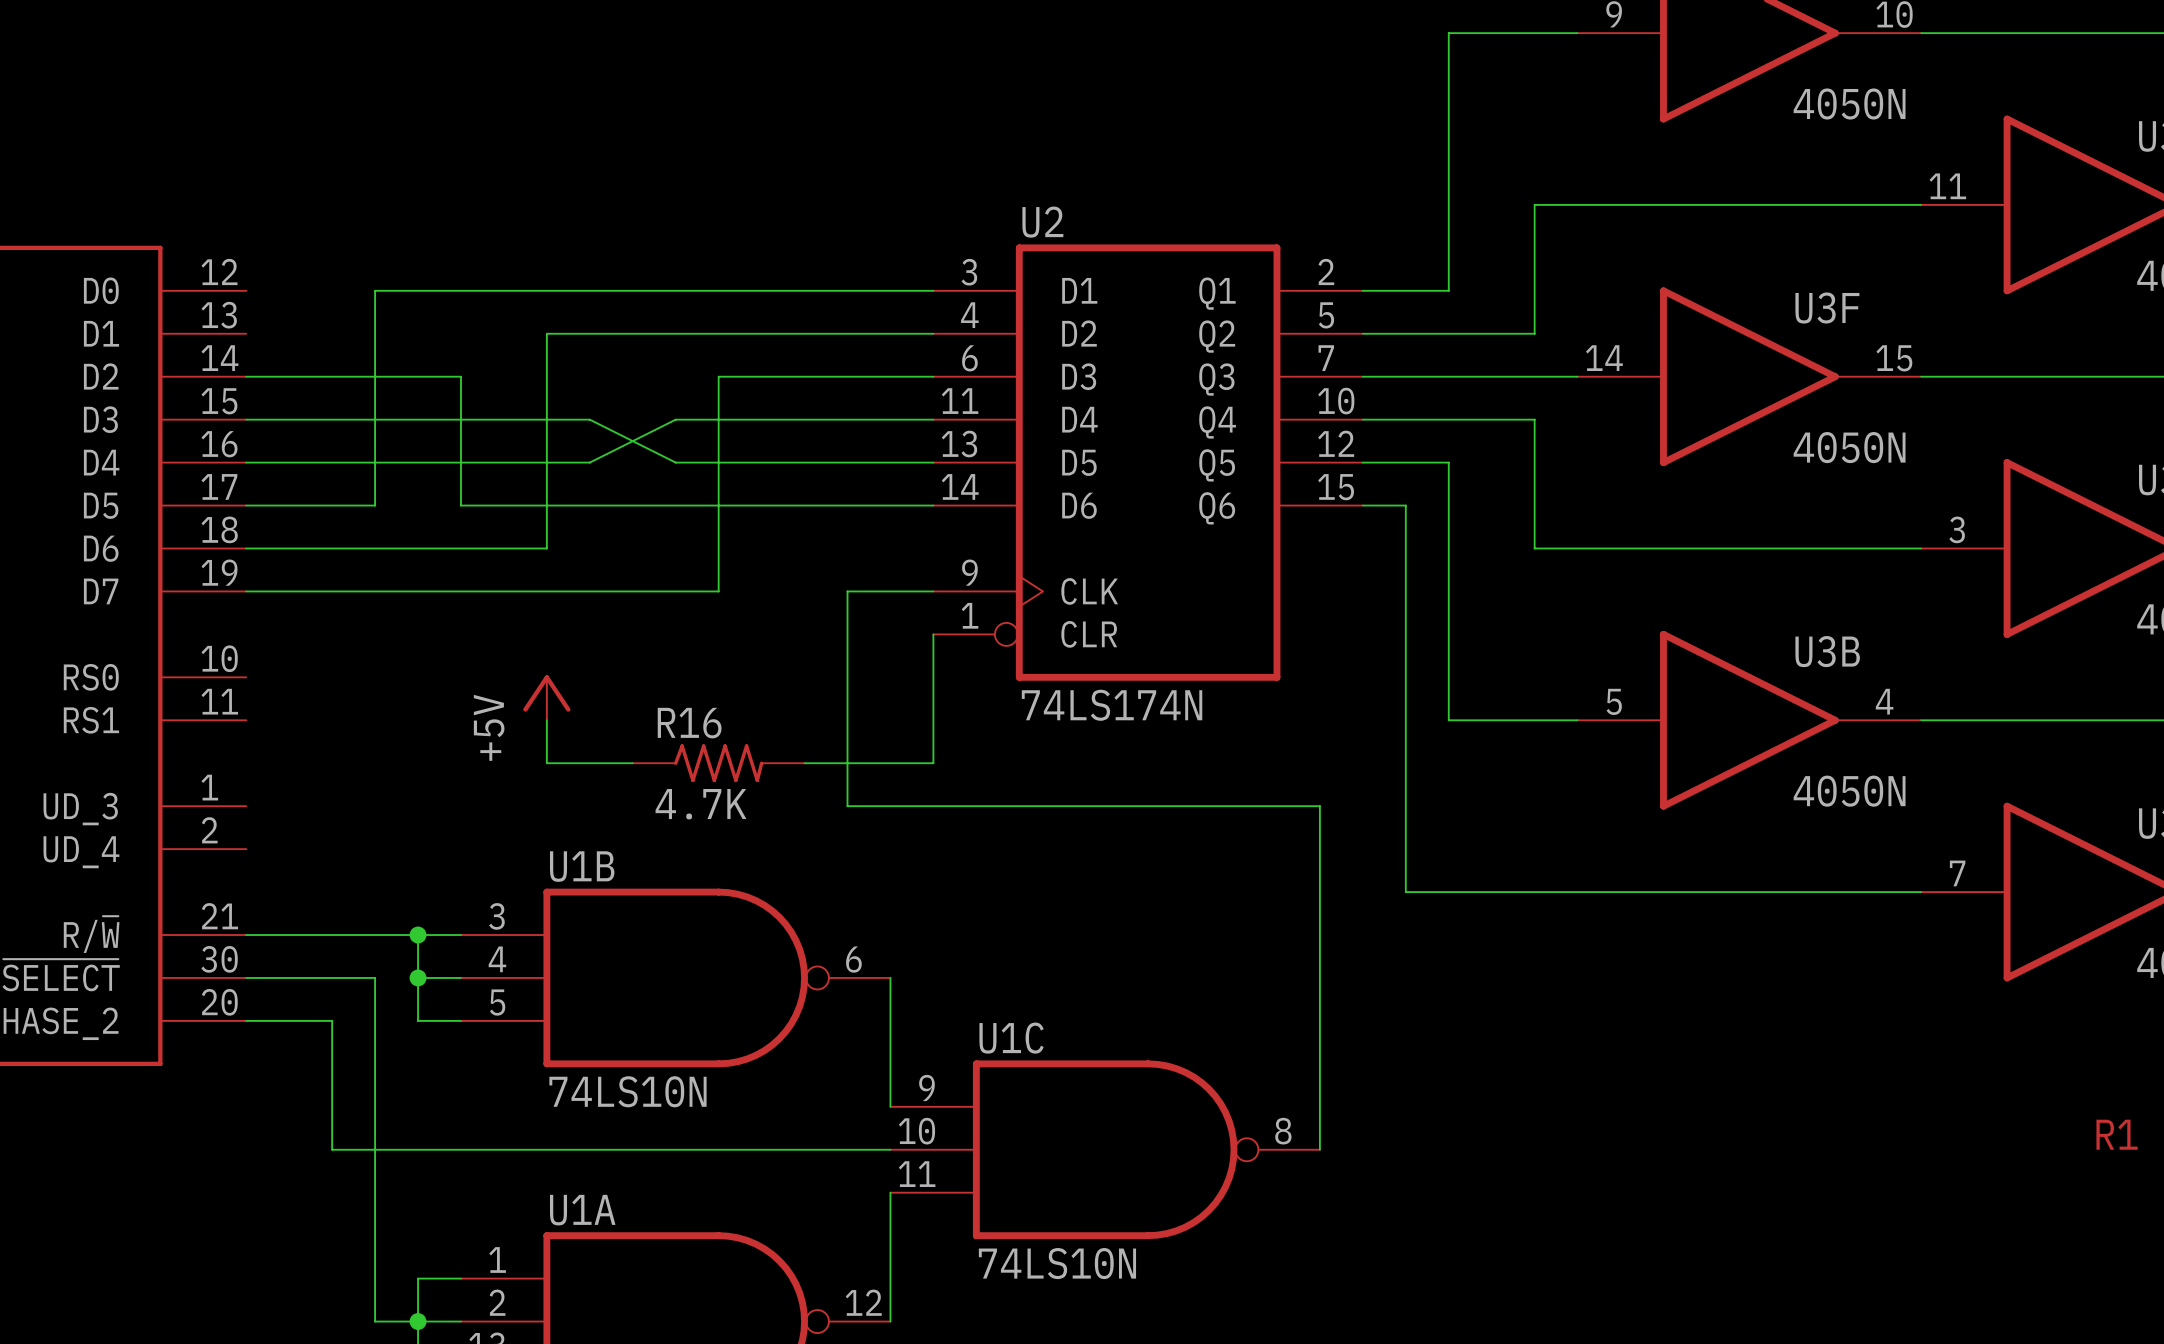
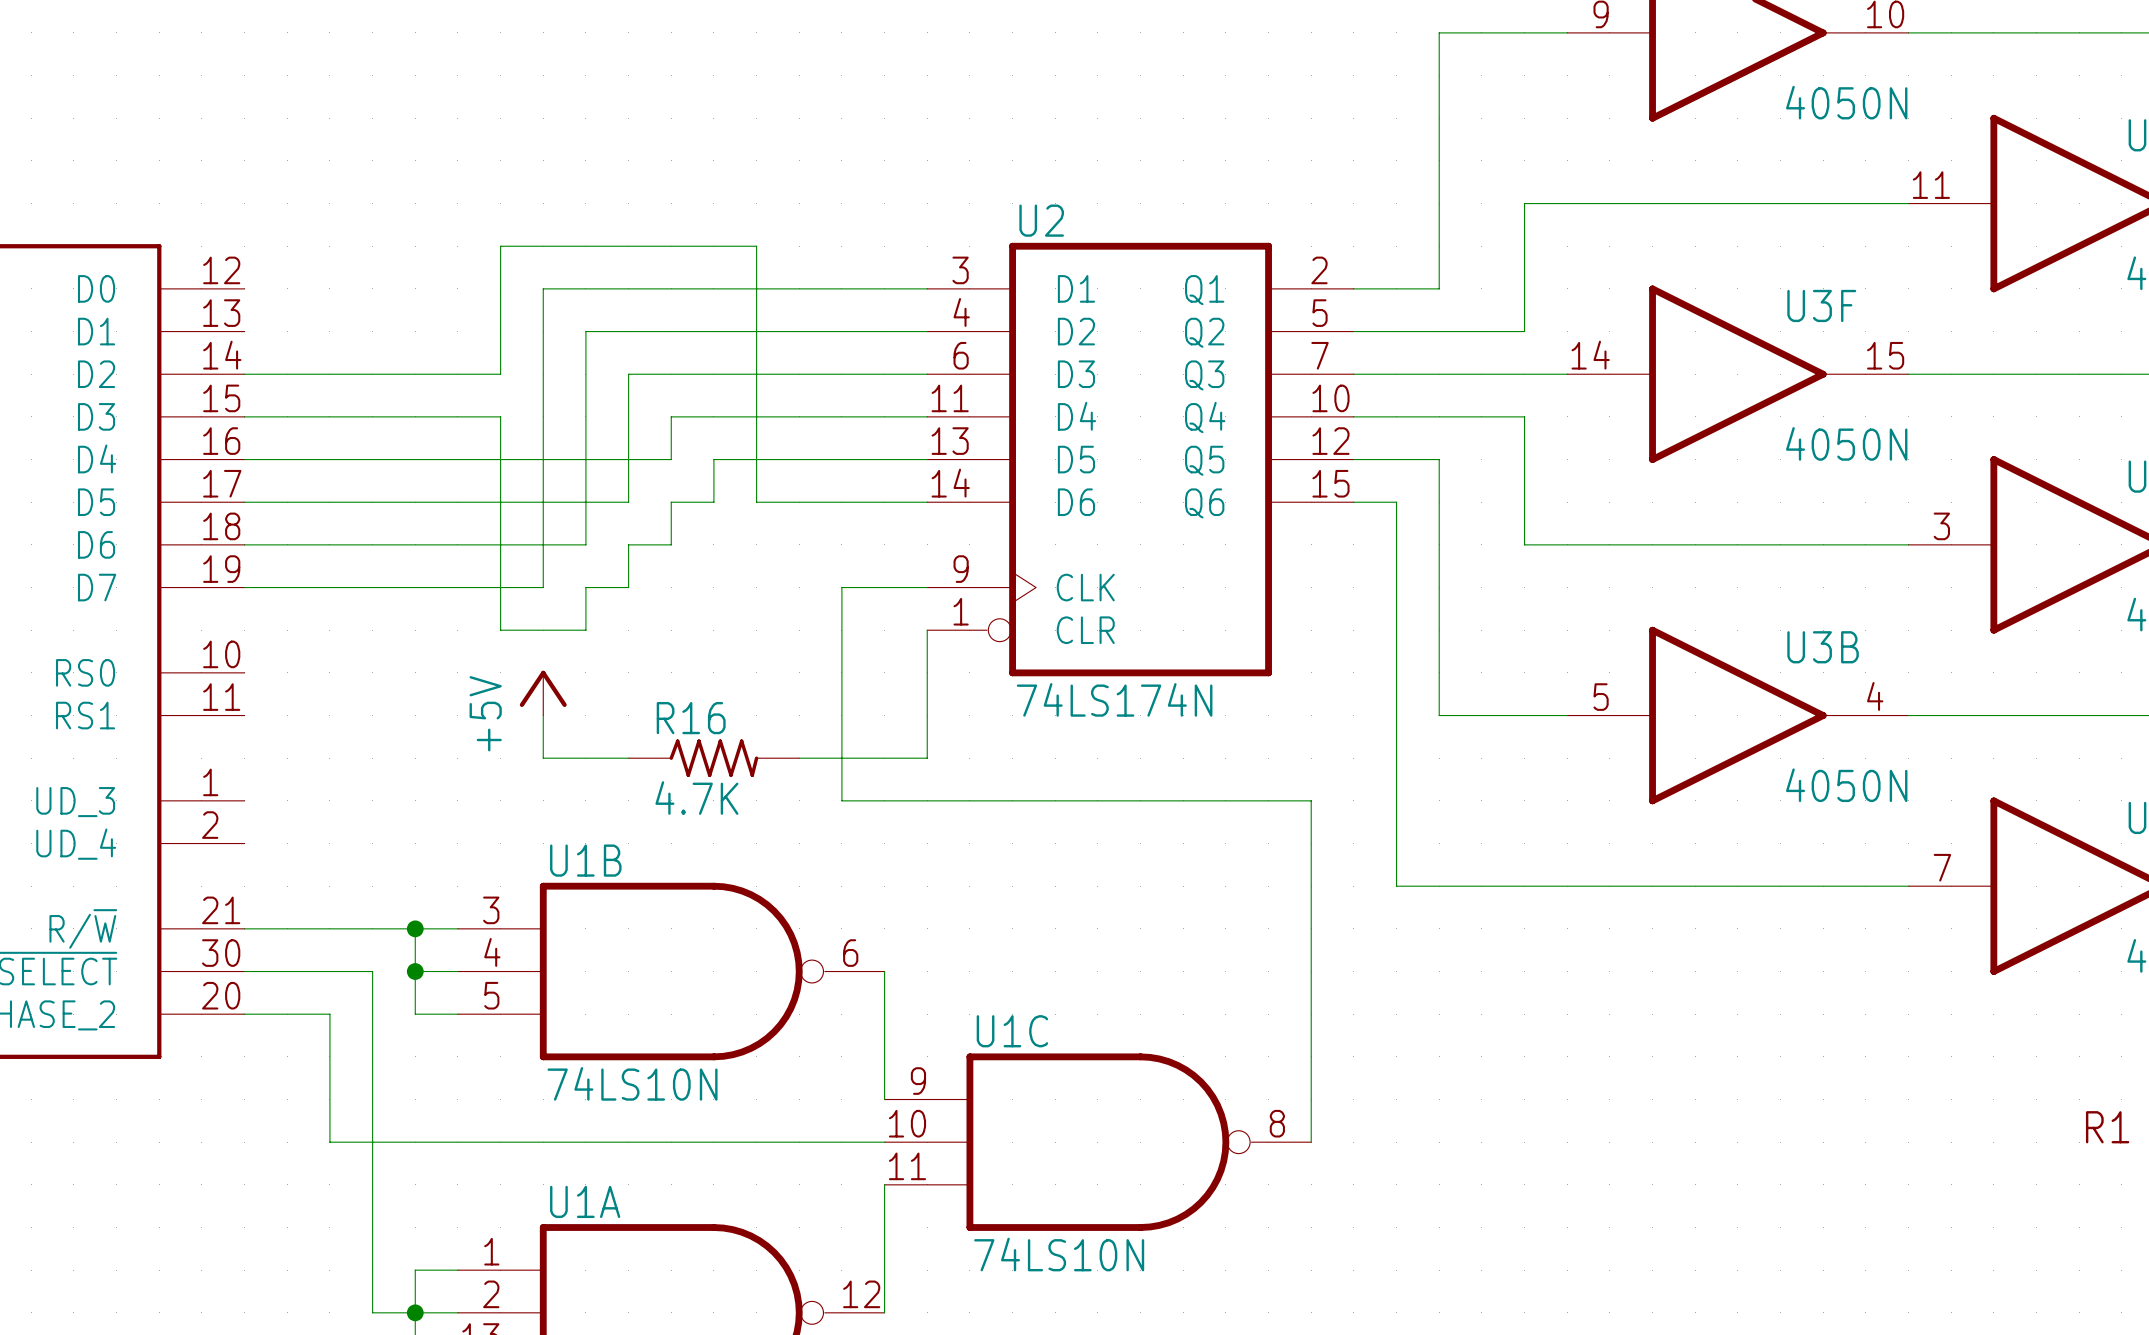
wire: (546, 290) (375, 290) (375, 505) -> none
wire: (546, 333) (589, 333) -> (543, 331) (543, 288)
wire: none -> (585, 331) (585, 544) (543, 544) (543, 587)
wire: (460, 376) (460, 505) -> (372, 502) (457, 502)
wire: (718, 376) (718, 462) (675, 462) (589, 419) (503, 419) -> (713, 374) (628, 374) (628, 502)
wire: (675, 419) (589, 462) -> (671, 416) (671, 459) (585, 459)
wire: (632, 505) (675, 505) -> (628, 587) (628, 544) (671, 544) (671, 502)
wire: (761, 505) (718, 505) (718, 591) (632, 591) -> (756, 502) (756, 246) (500, 246) (500, 374) (457, 374)
wire: (546, 591) (589, 591) -> (500, 416) (500, 630) (585, 630) (585, 587)

